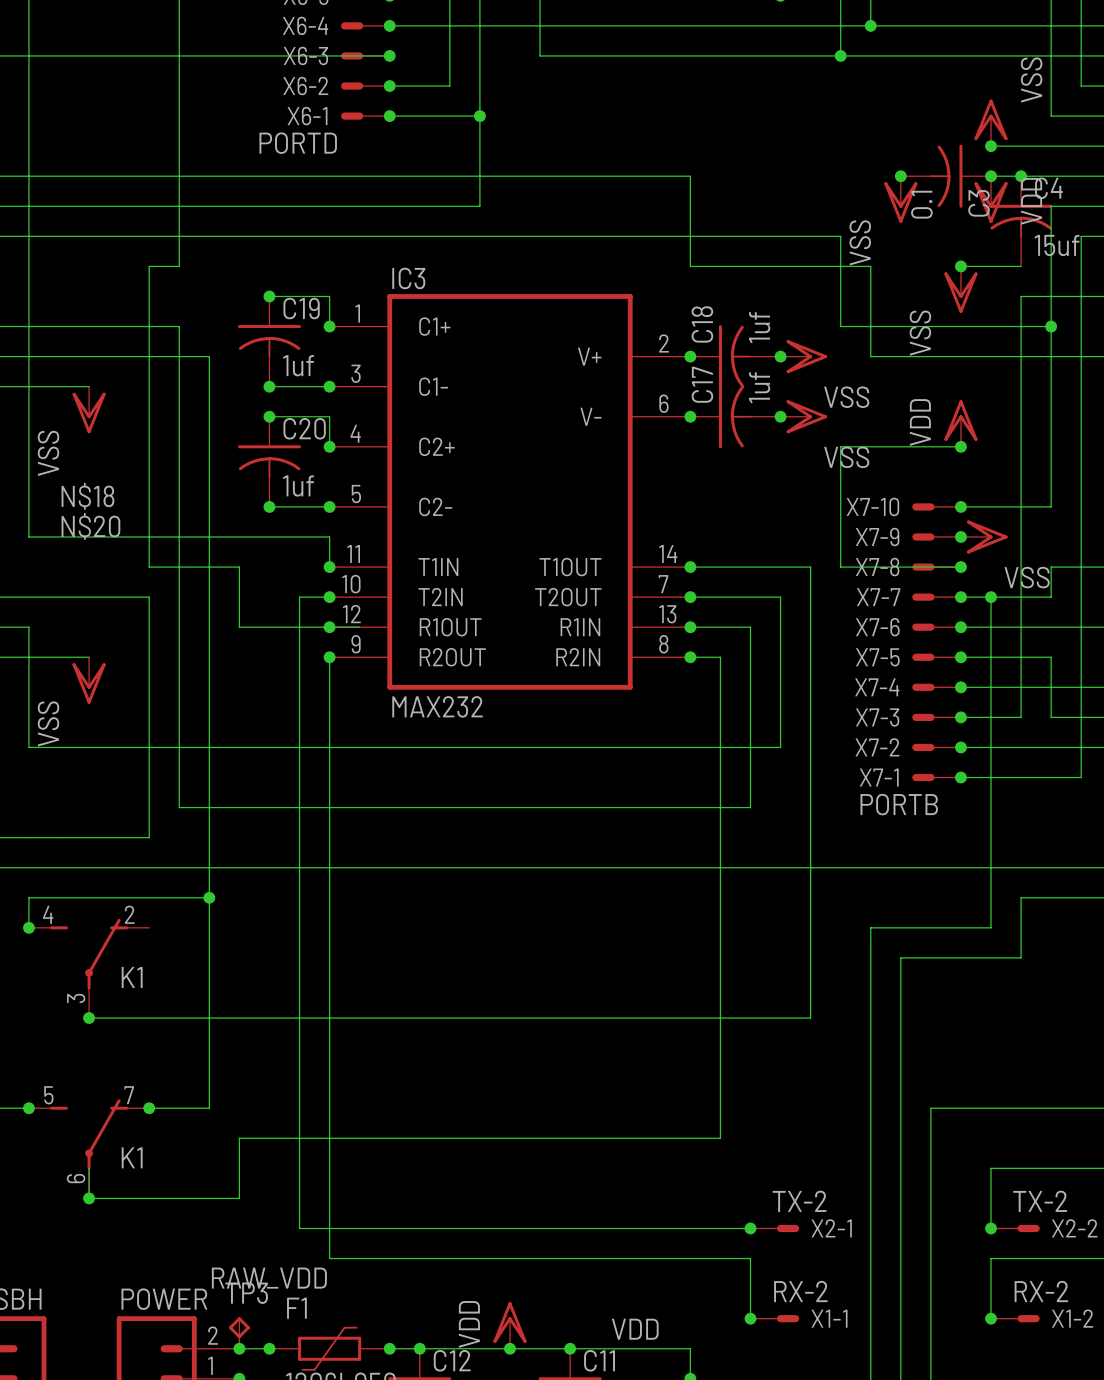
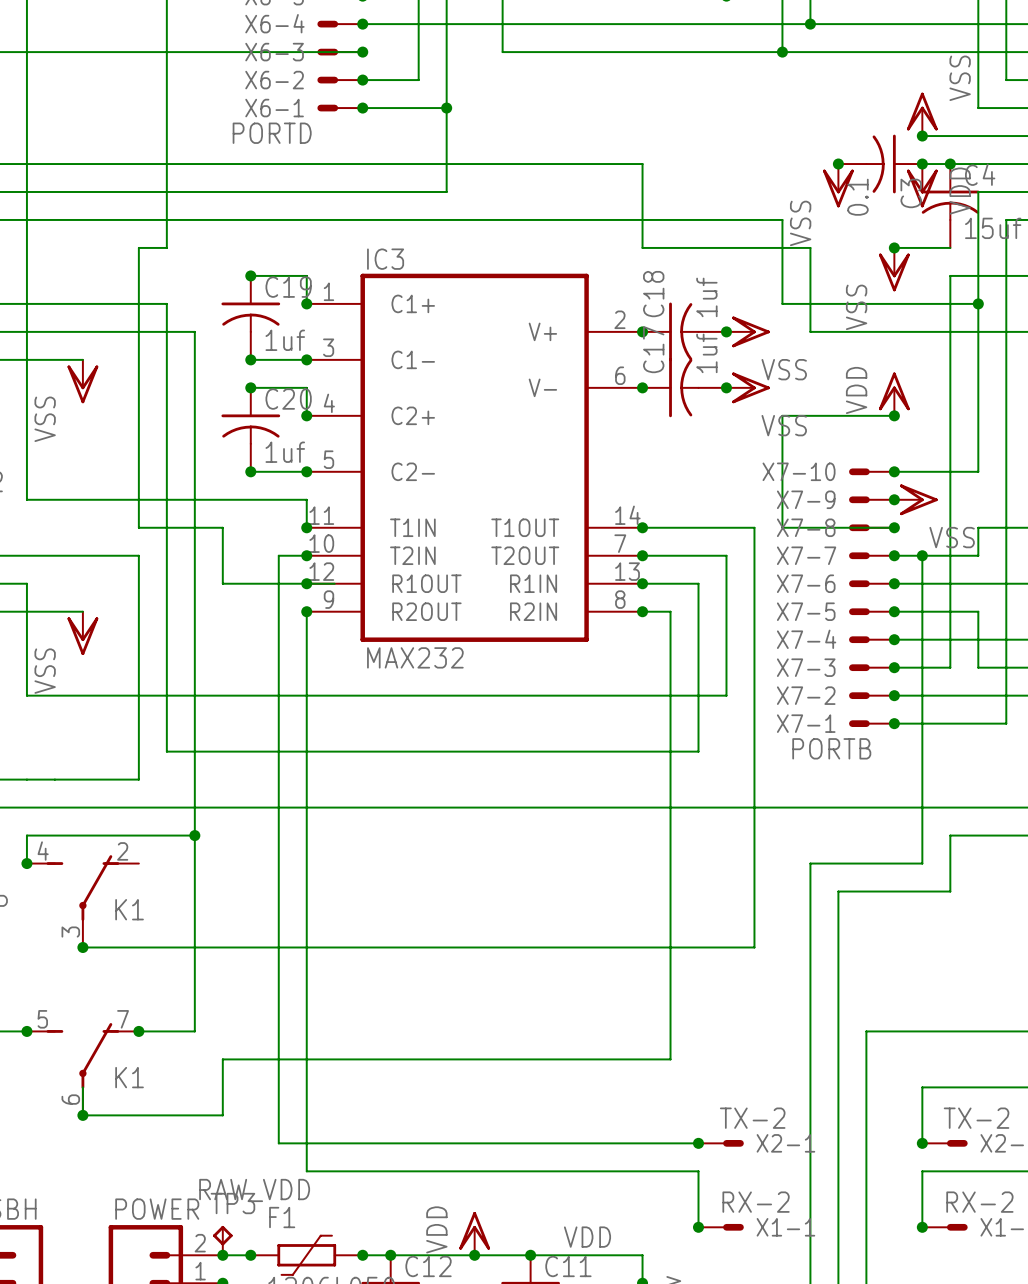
label: N$18 (87, 496) -> none
label: N$20 (90, 526) -> none

